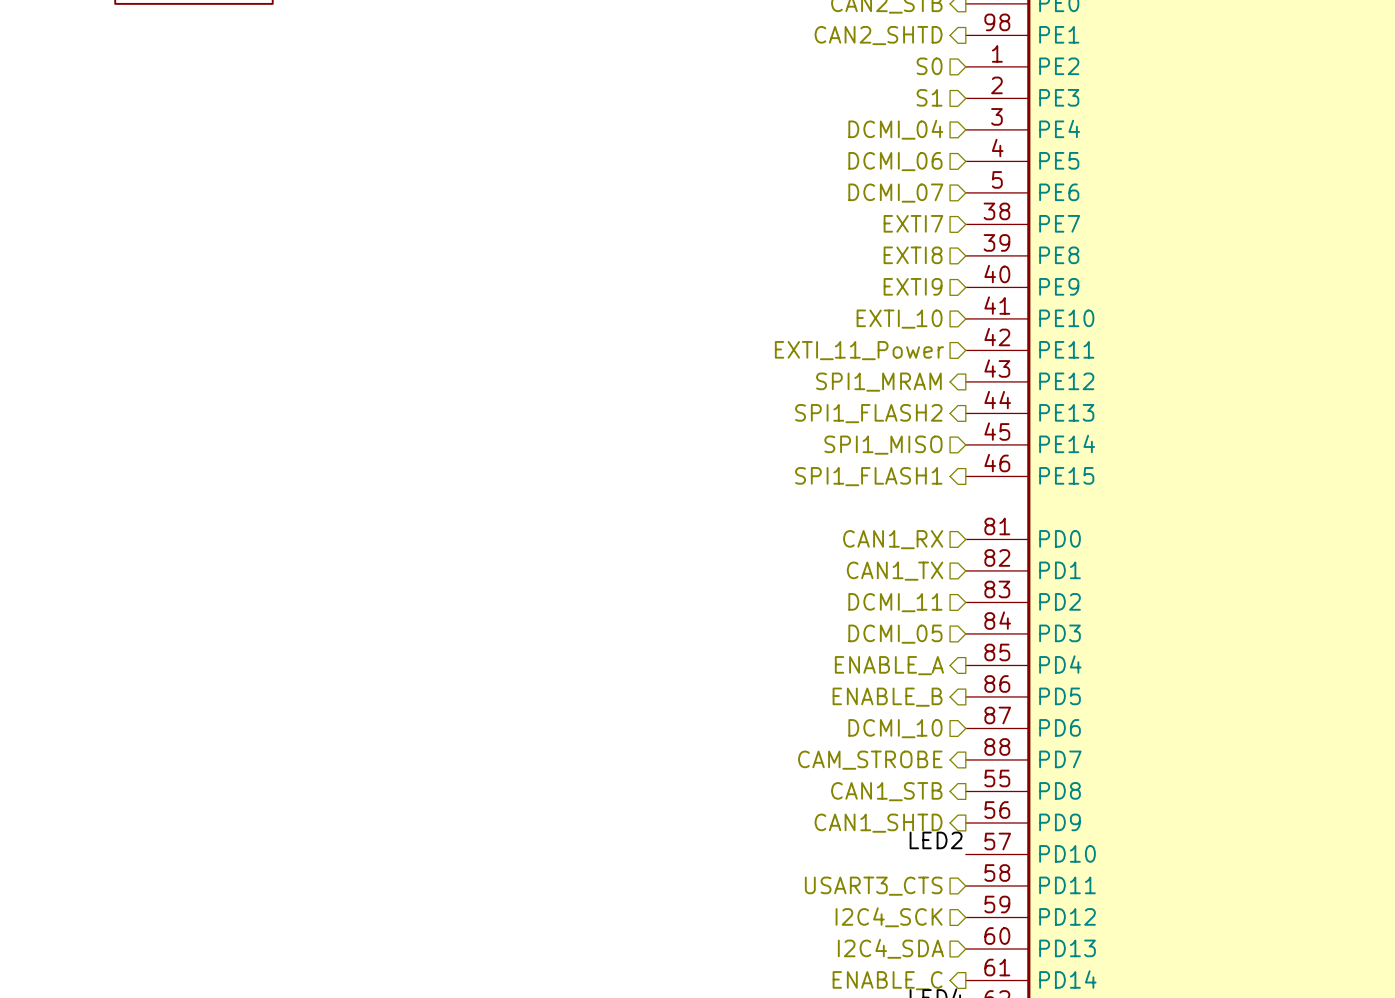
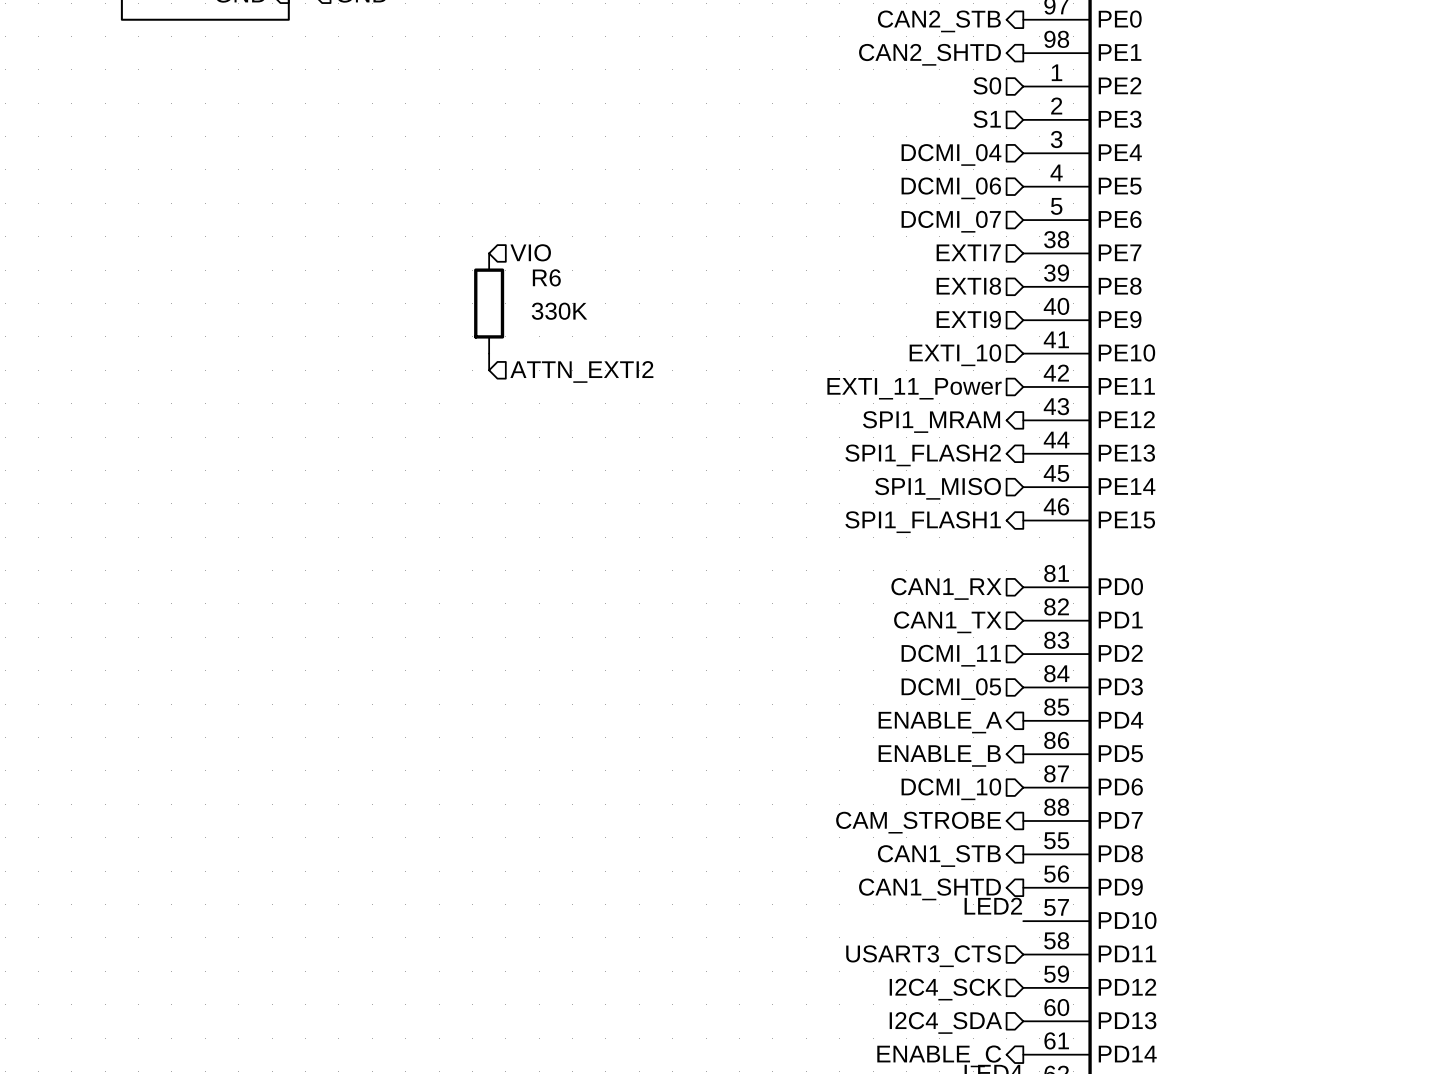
hierarchical label: none -> VIO (530, 252)
R6: none -> 330K (489, 303)
wire: none -> (489, 353) (489, 370)
hierarchical label: none -> ATTN_EXTI2 (581, 371)

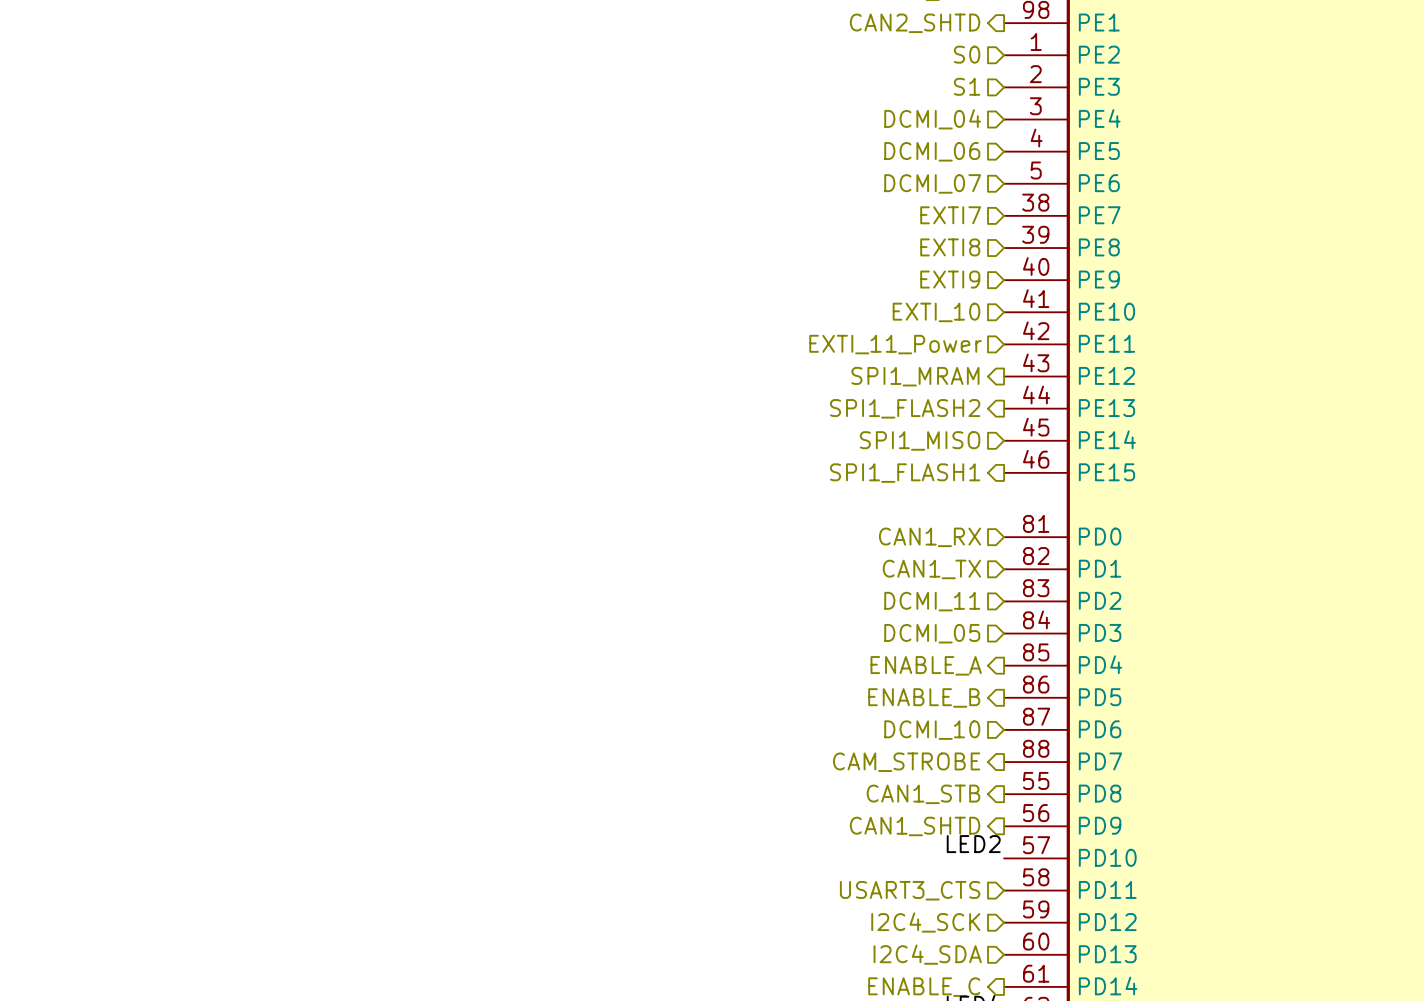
hierarchical label: VIO (530, 252) -> none
R6: 330K (489, 303) -> none
wire: (489, 353) (489, 370) -> none
hierarchical label: ATTN_EXTI2 (581, 371) -> none

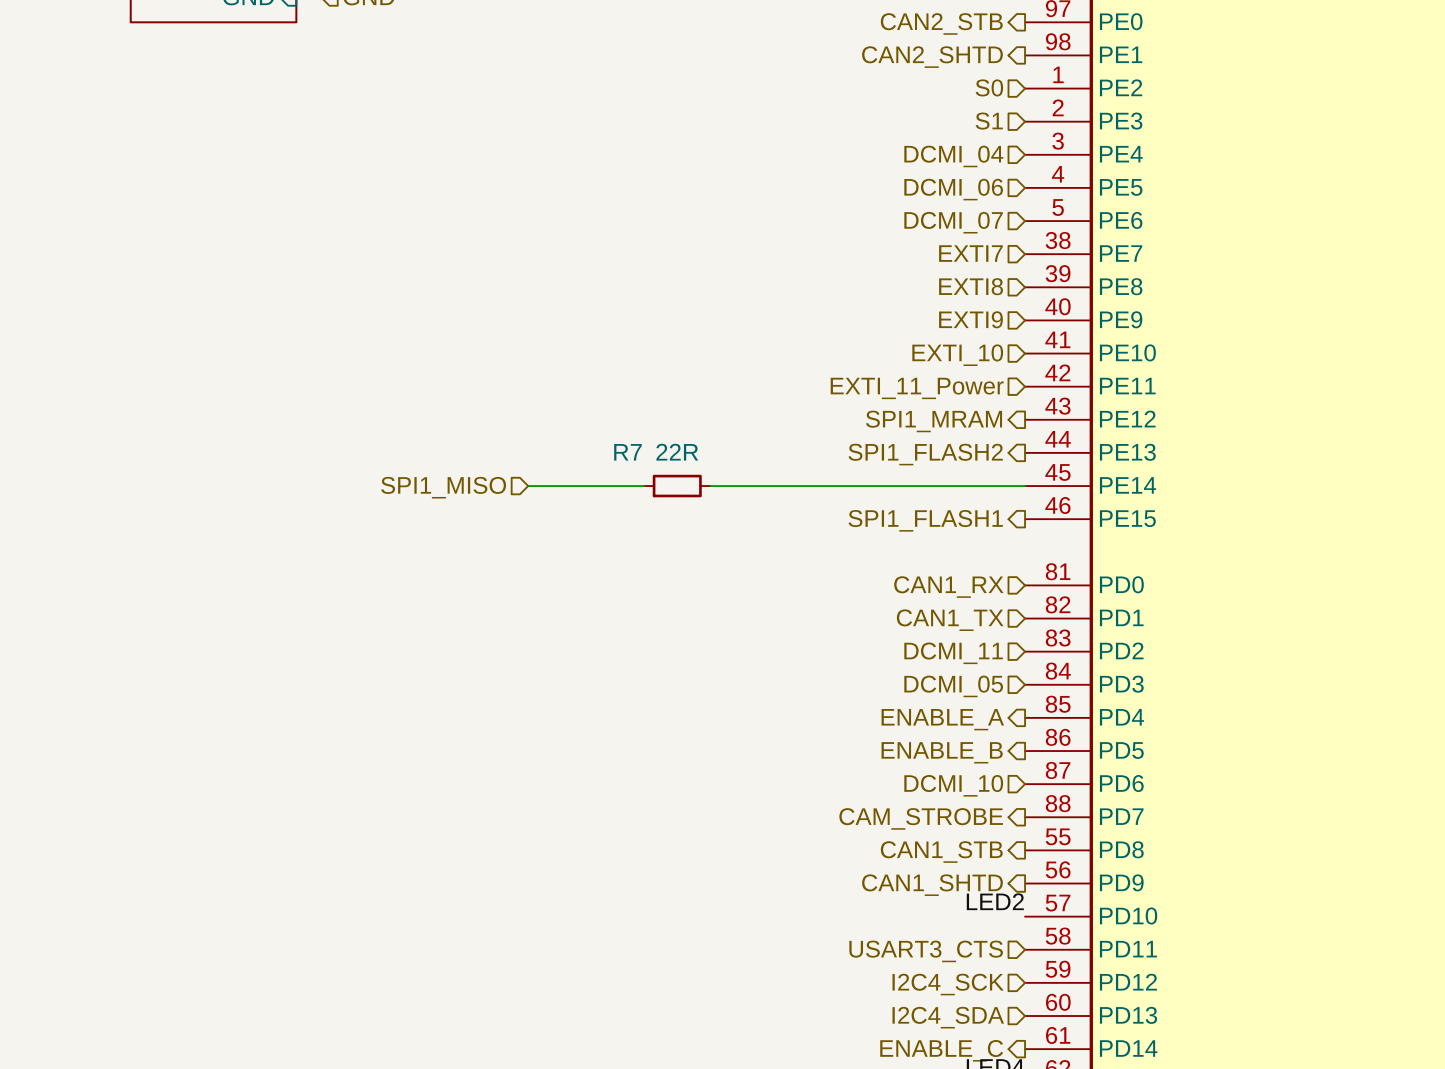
hierarchical label: none -> SPI1_MISO (443, 487)
wire: none -> (528, 486) (644, 486)
R7: none -> 22R (677, 486)
wire: none -> (710, 486) (1025, 486)
hierarchical label: SPI1_MISO (920, 440) -> none

